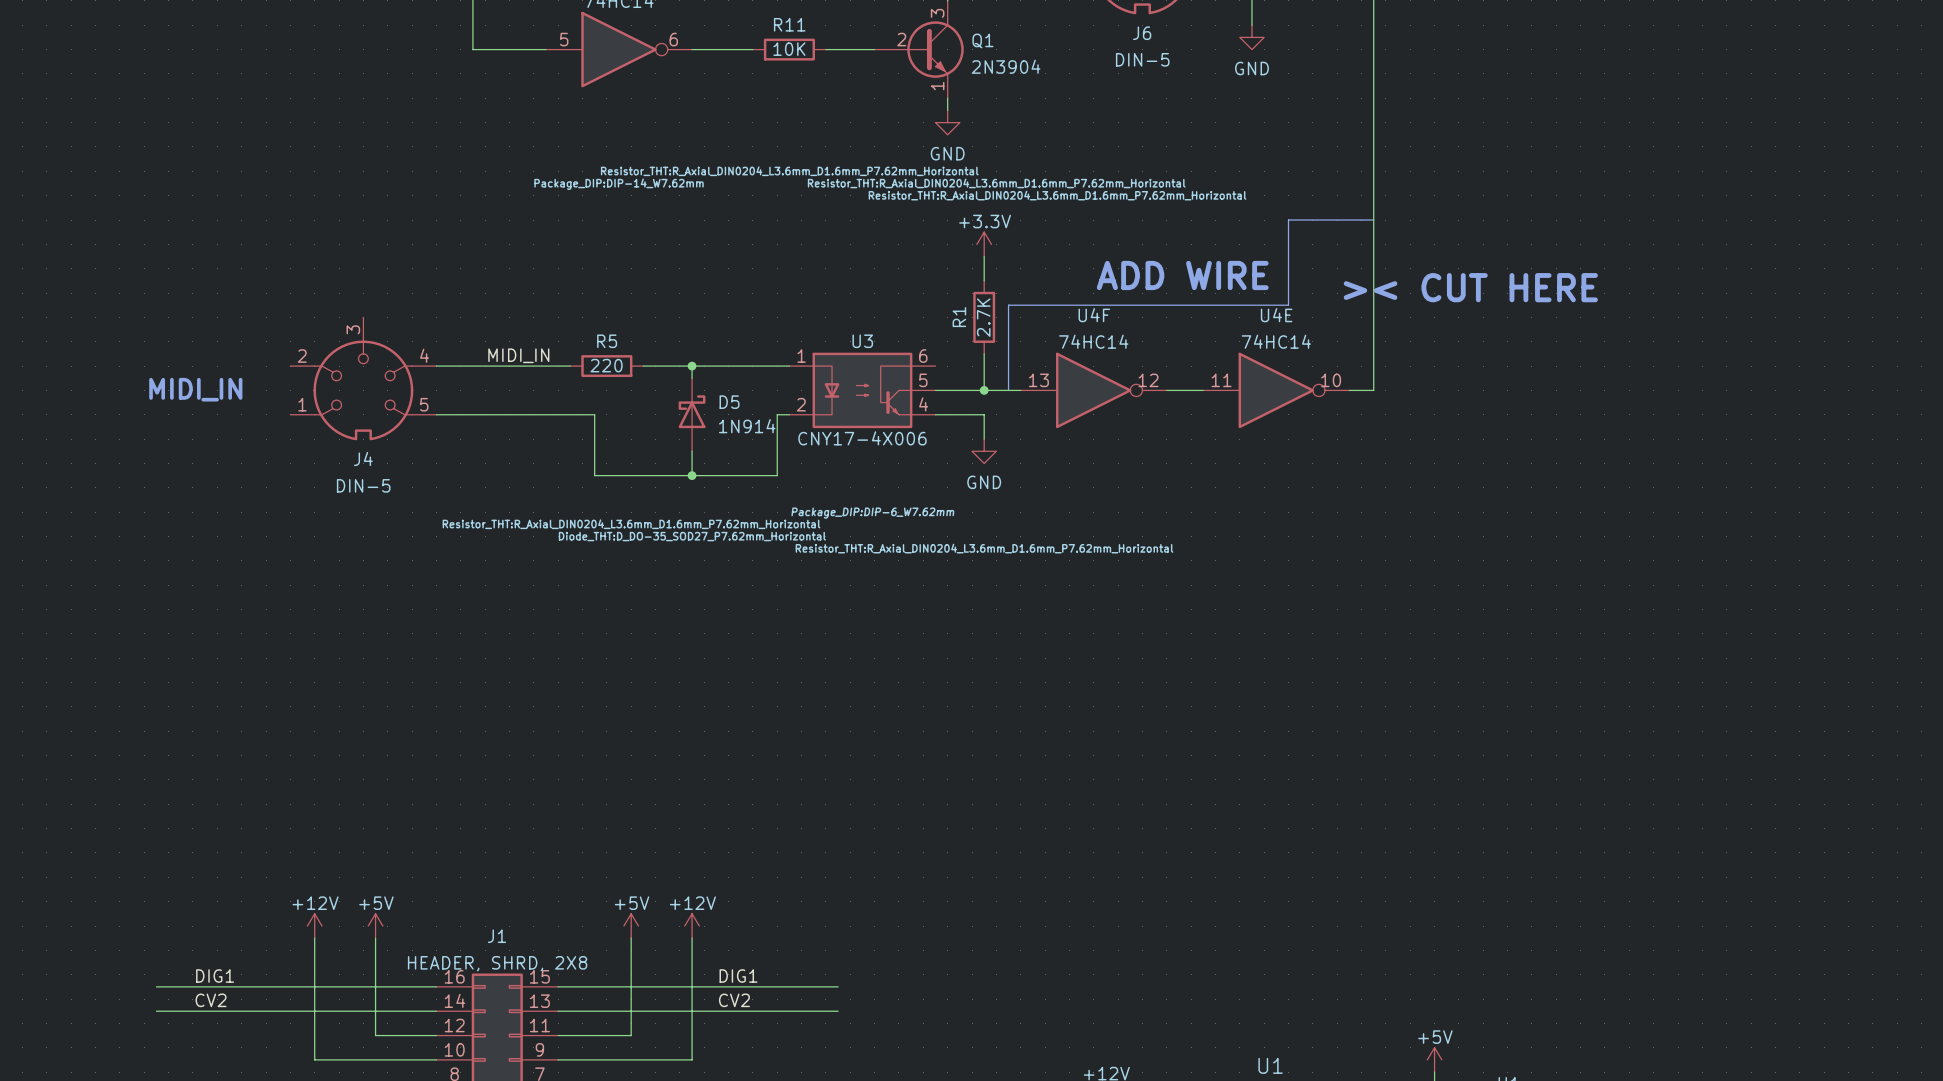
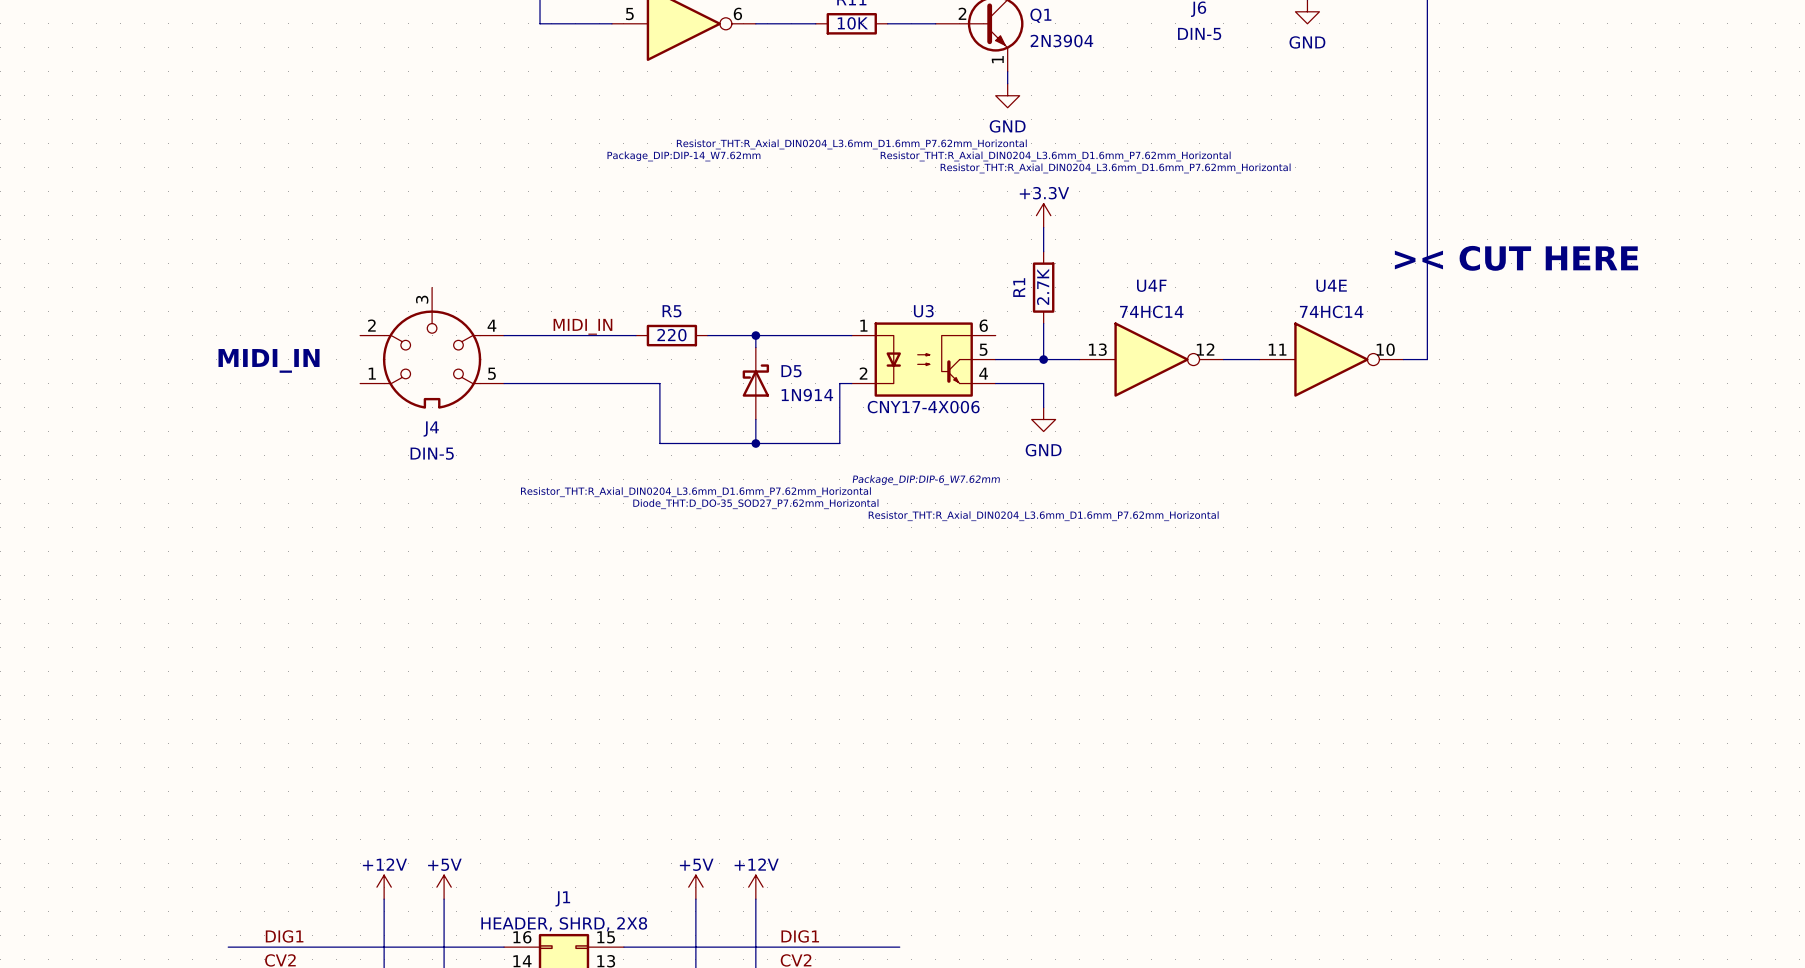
line: (1373, 220) (1288, 220) (1288, 305) (1008, 305) (1008, 390) -> none
text: ADD WIRE (1182, 275) -> none

